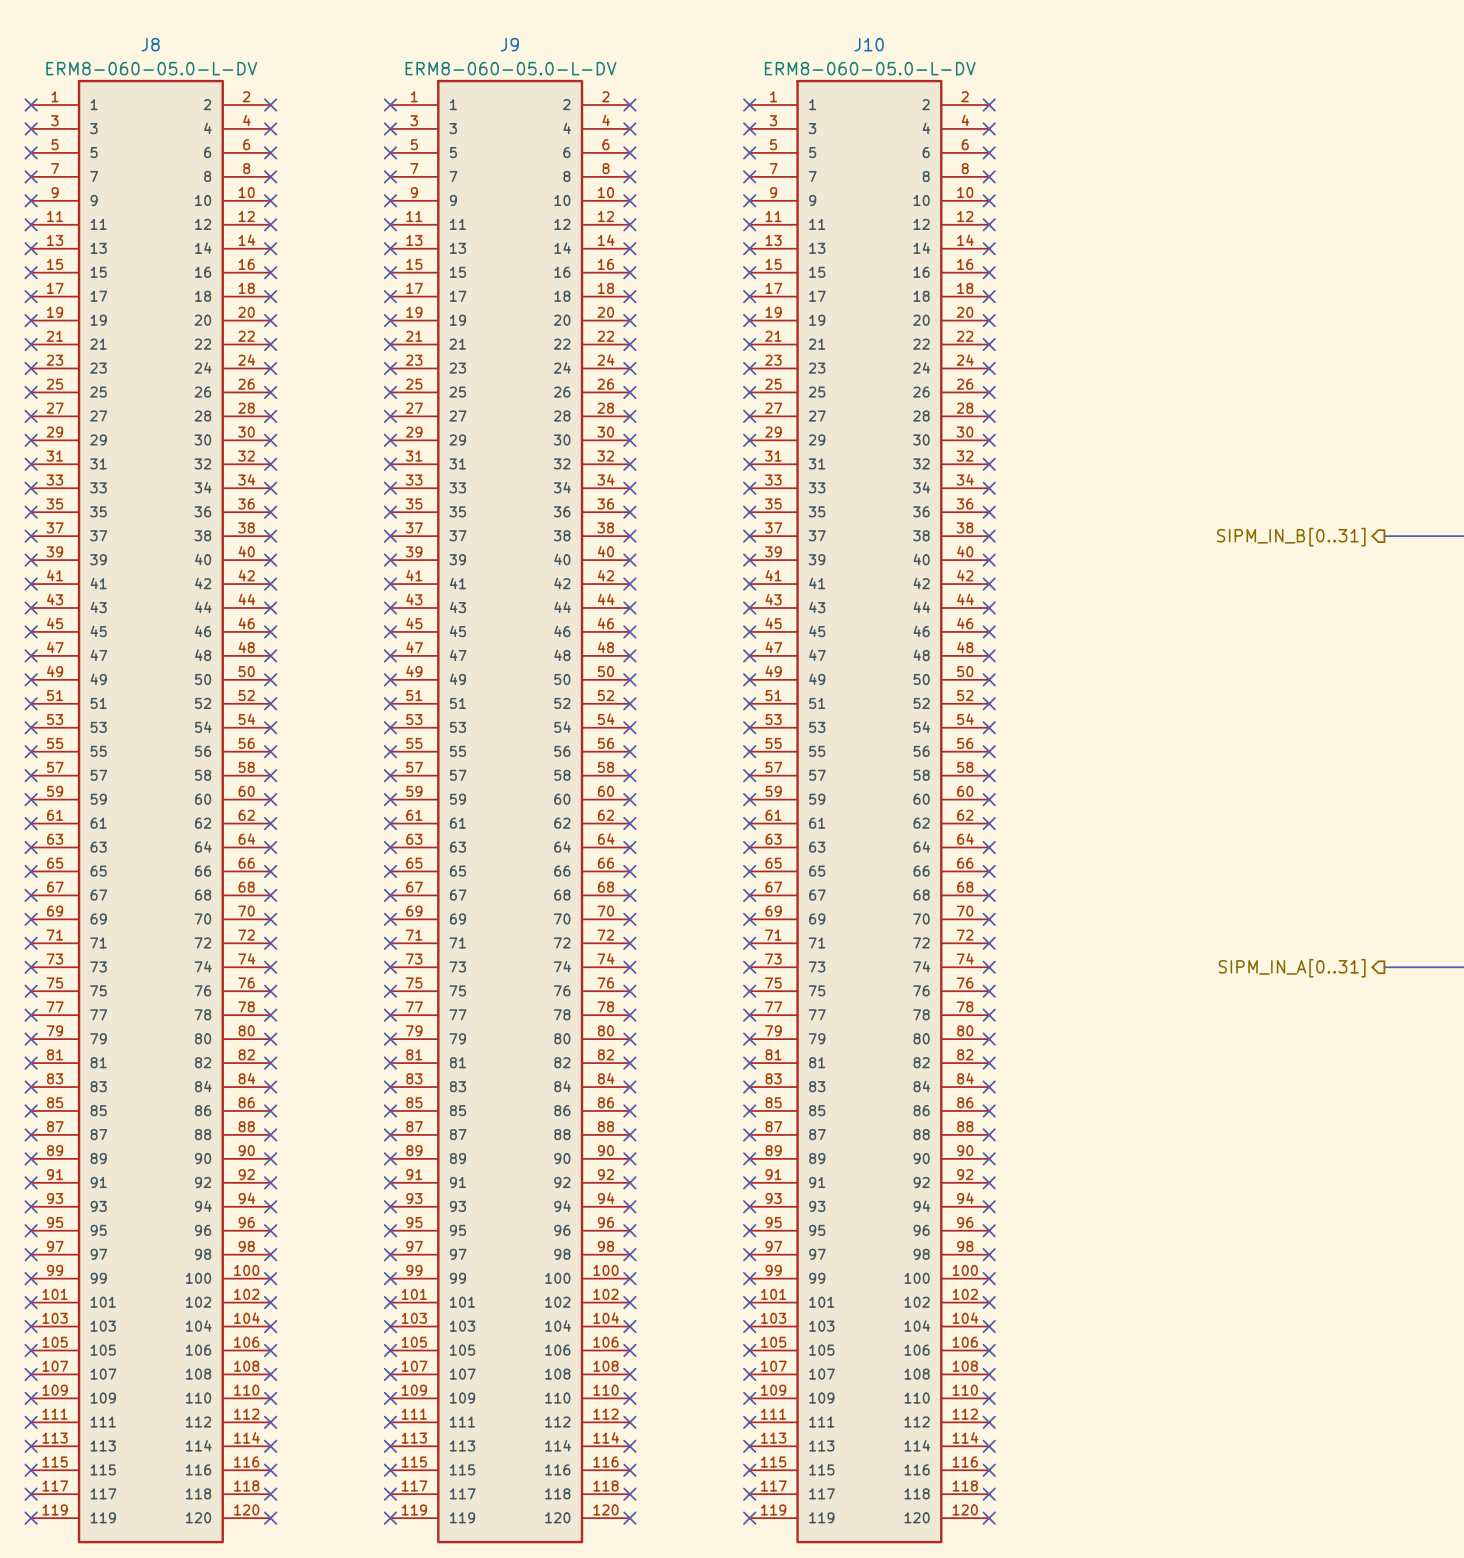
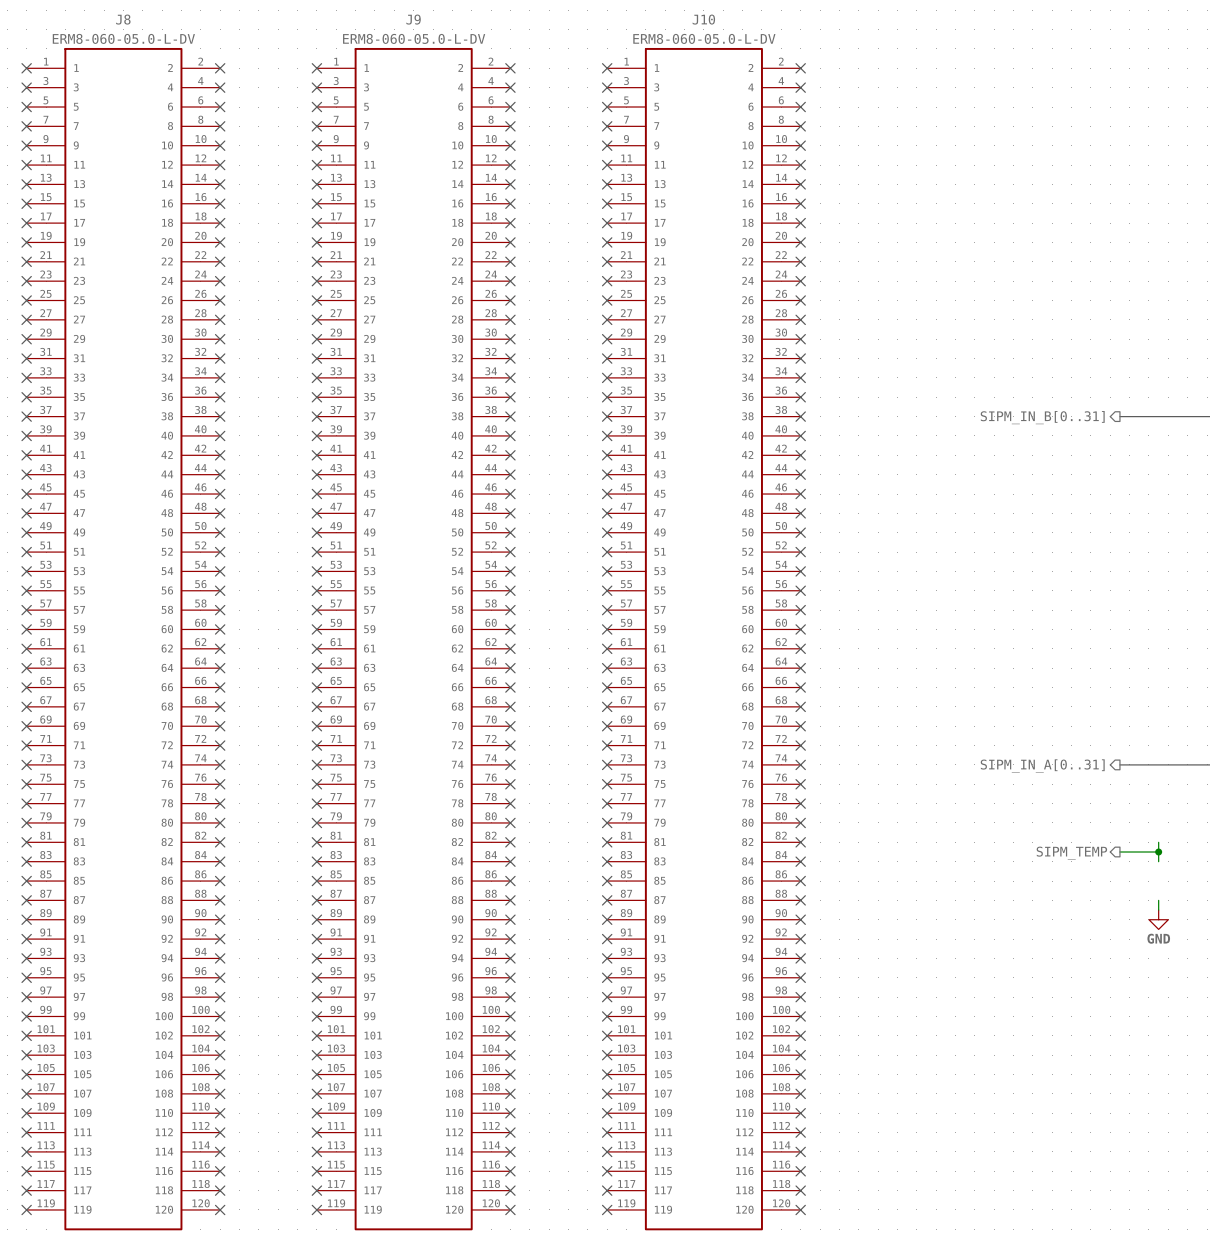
wire: none -> (1158, 842) (1158, 861)
hierarchical label: none -> SIPM_TEMP (1071, 853)
wire: none -> (1119, 852) (1158, 852)
junction: none -> (1158, 852)
wire: none -> (1158, 900) (1158, 910)
power symbol: none -> GND (1158, 919)

